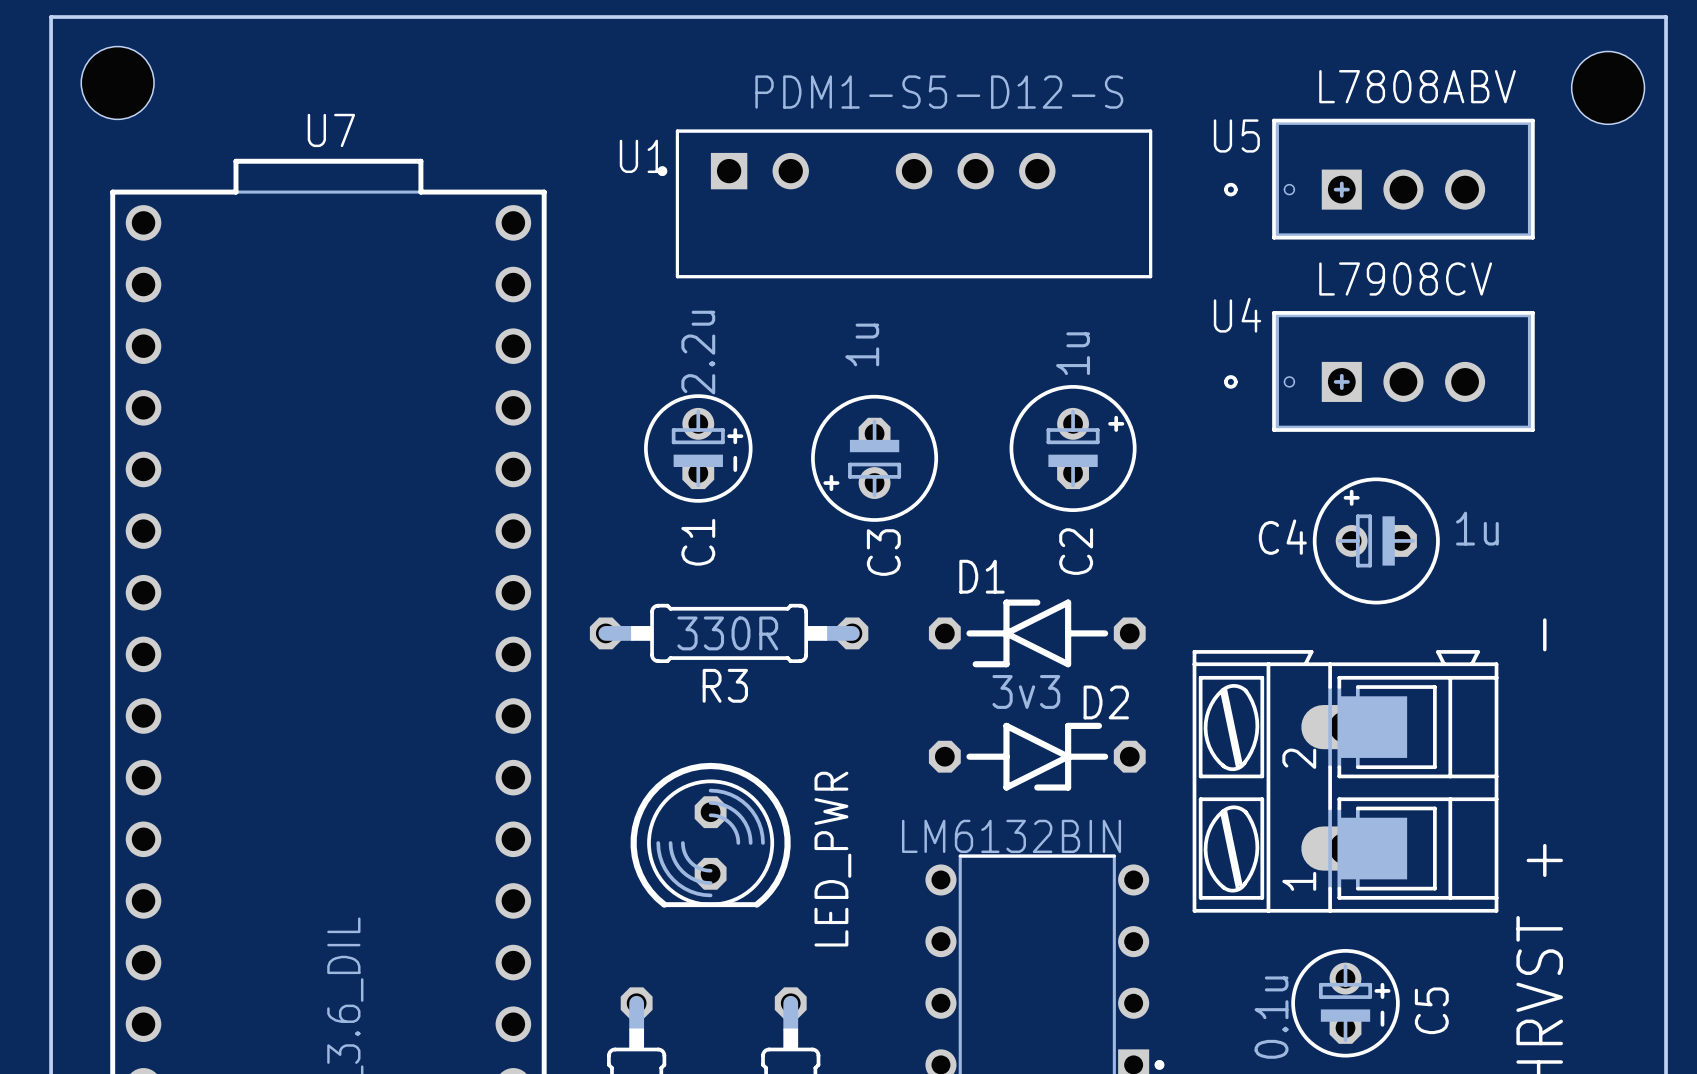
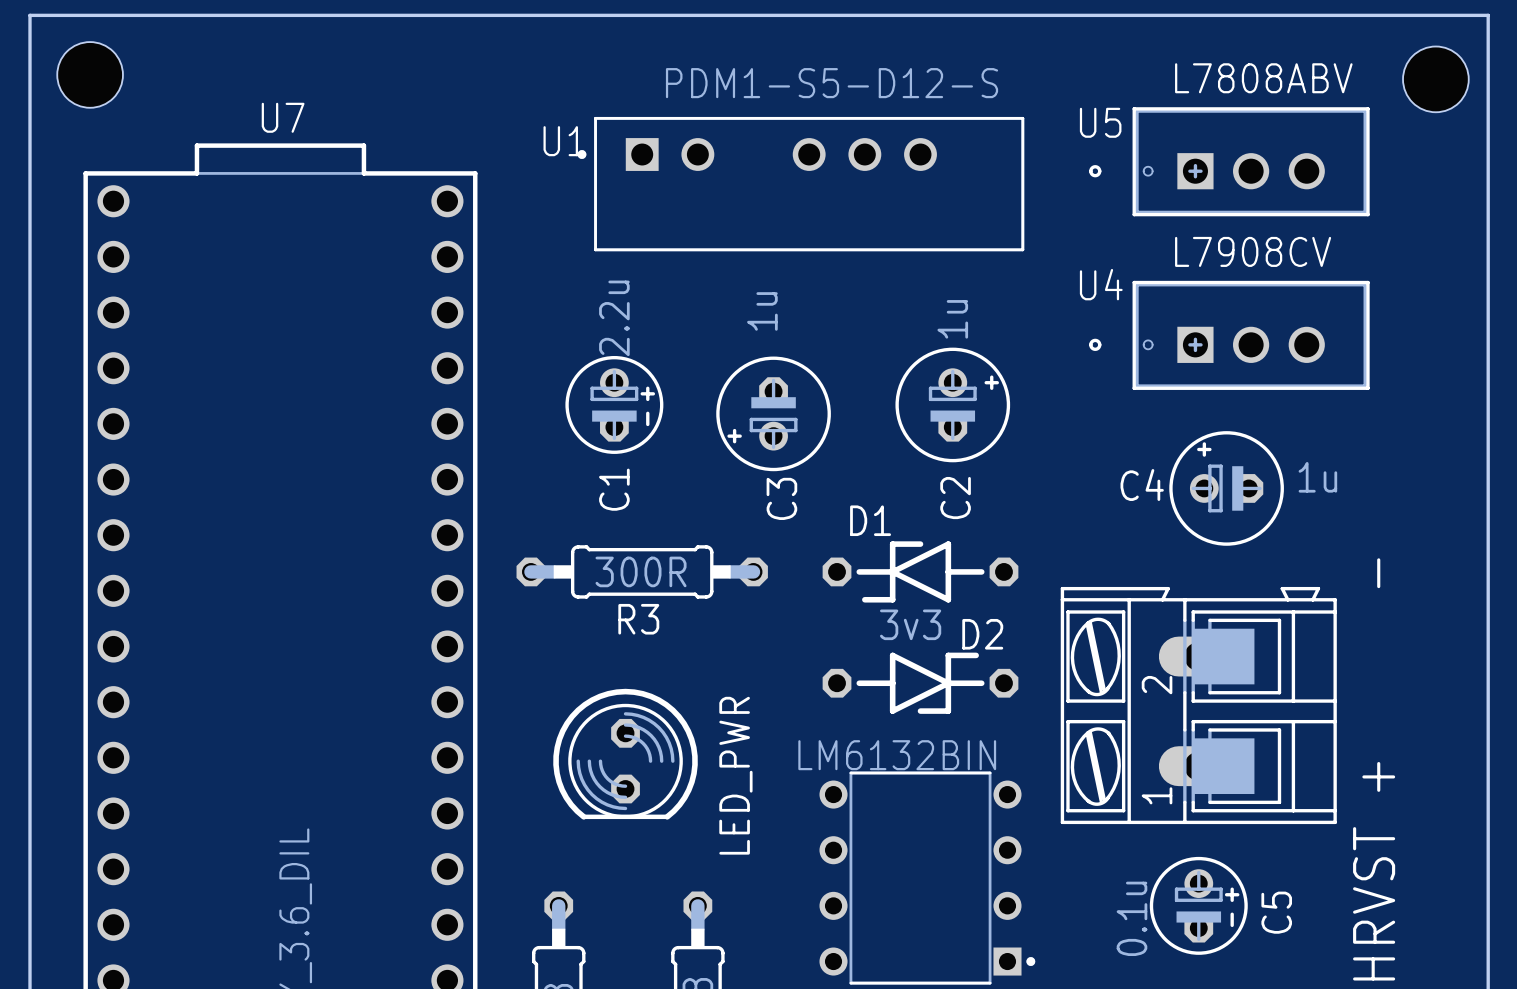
R3 value: 330R (727, 633) -> 300R (641, 571)

